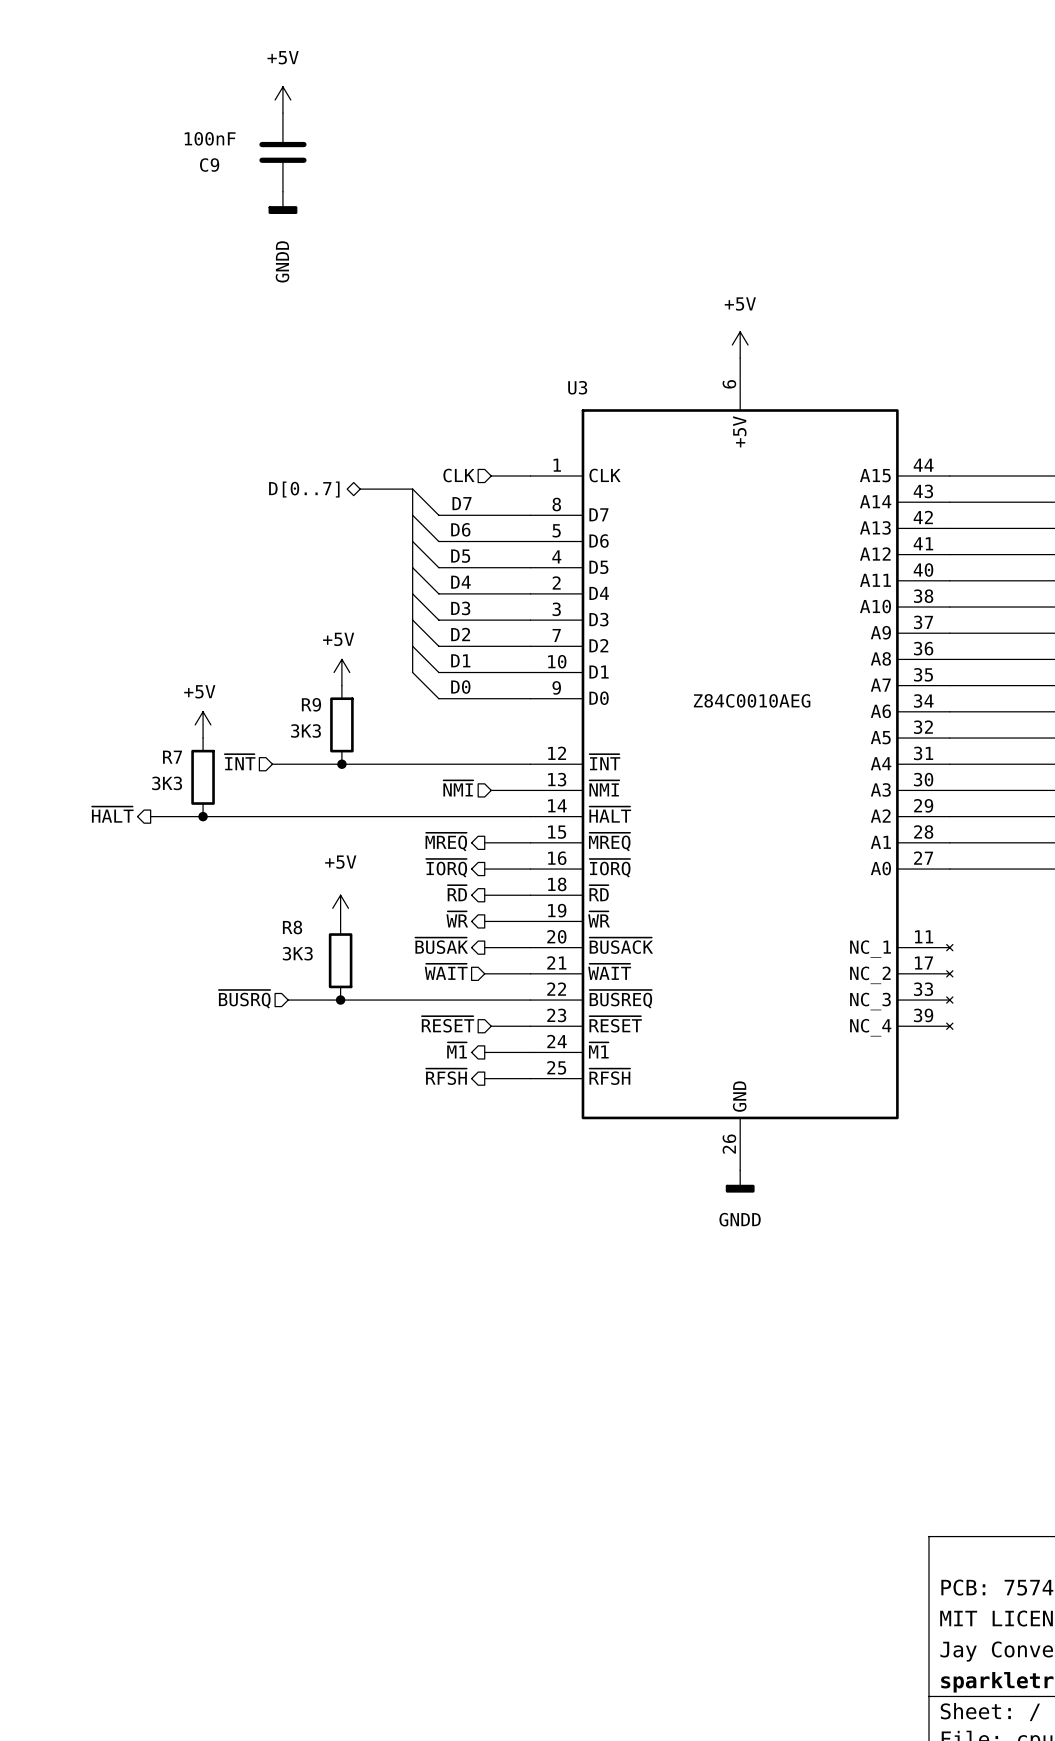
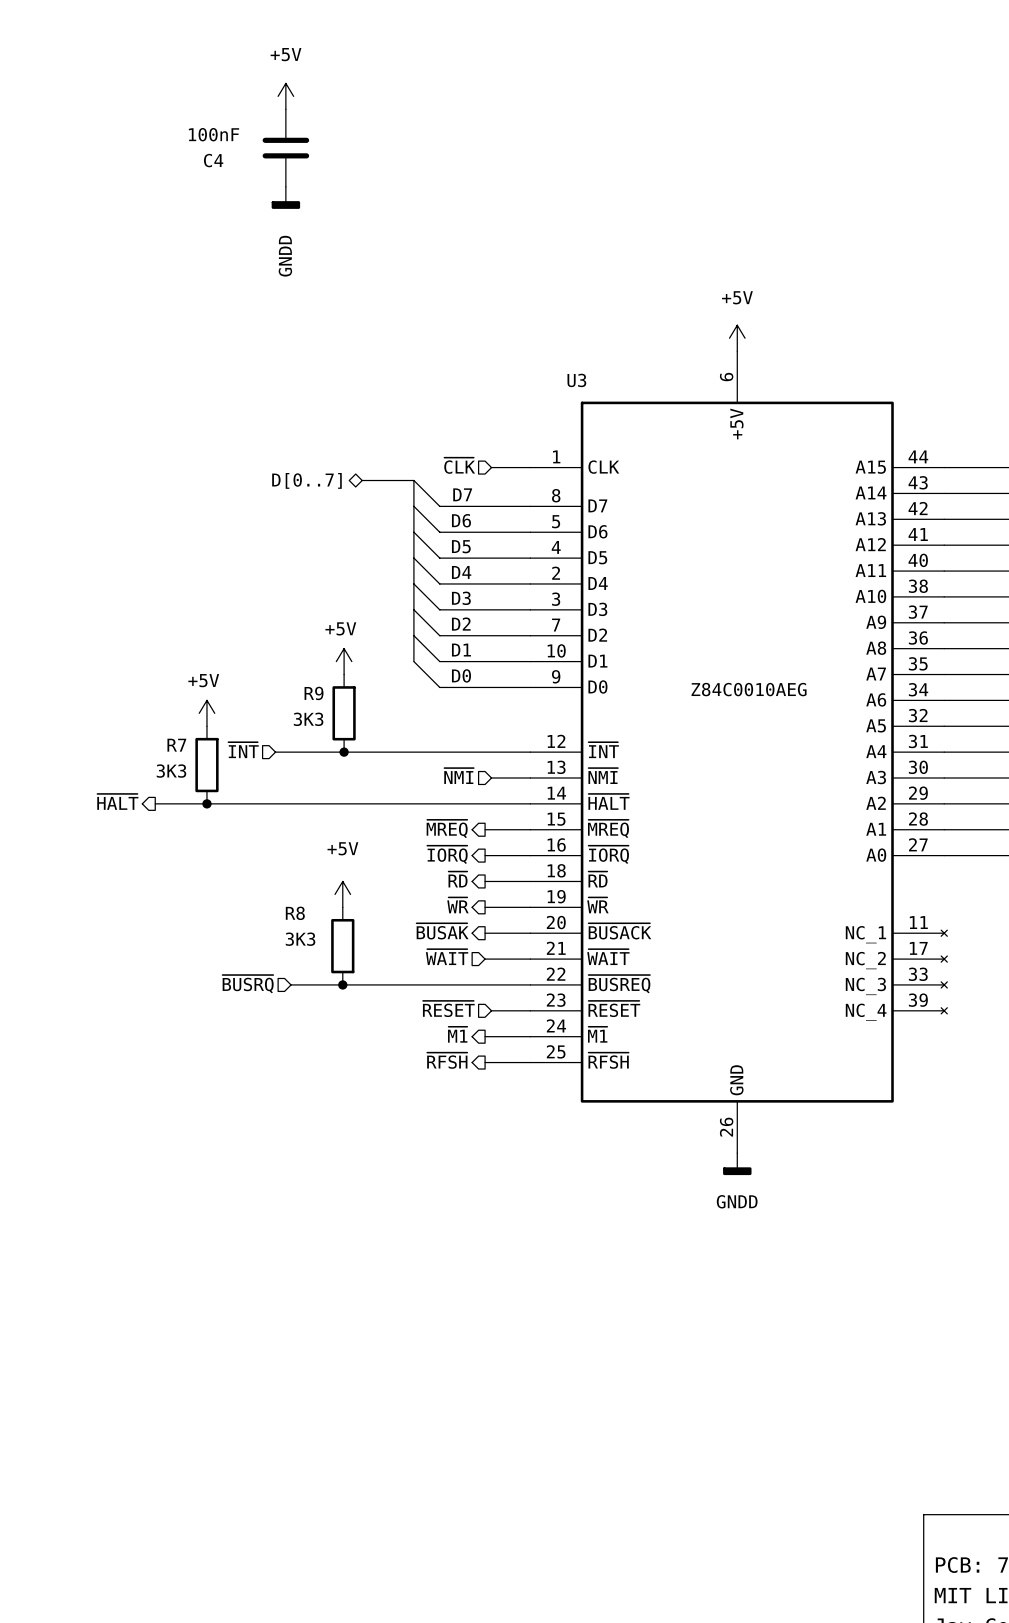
C9 name: C9 (209, 165) -> C4 (213, 160)
hierarchical label: CLK (458, 475) -> ~{CLK} (459, 465)

